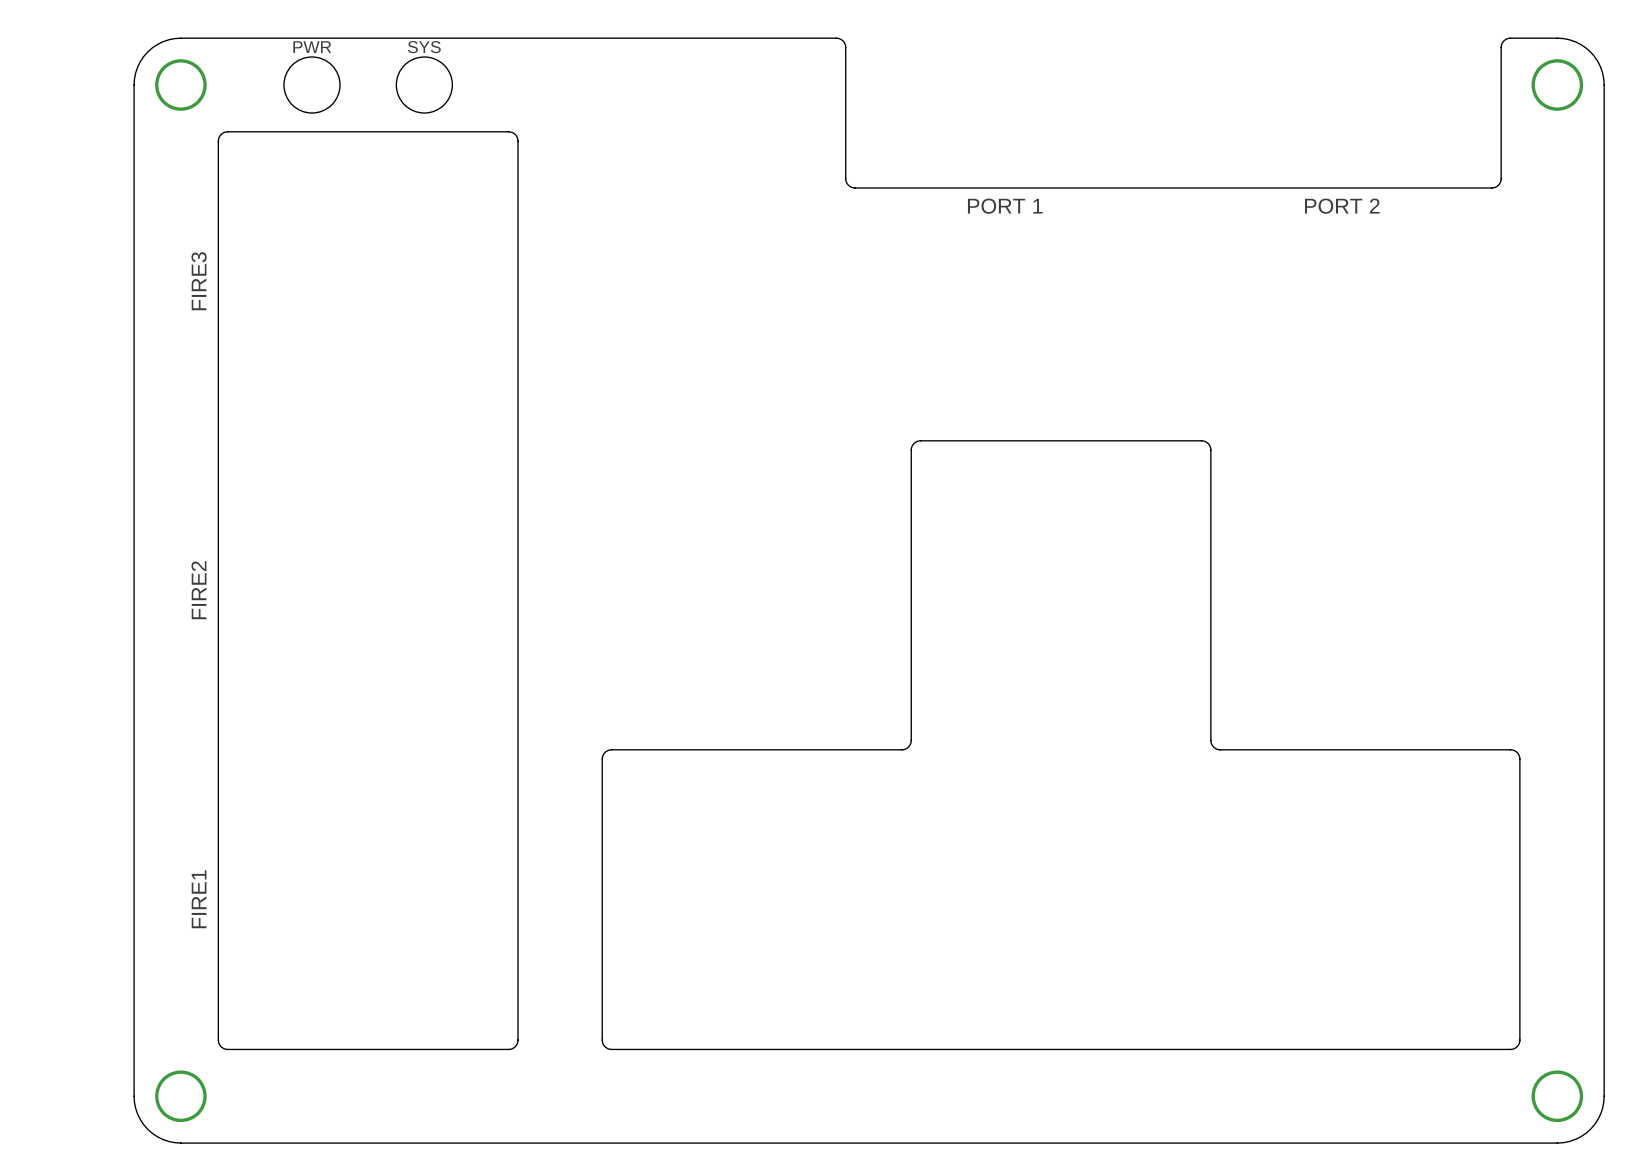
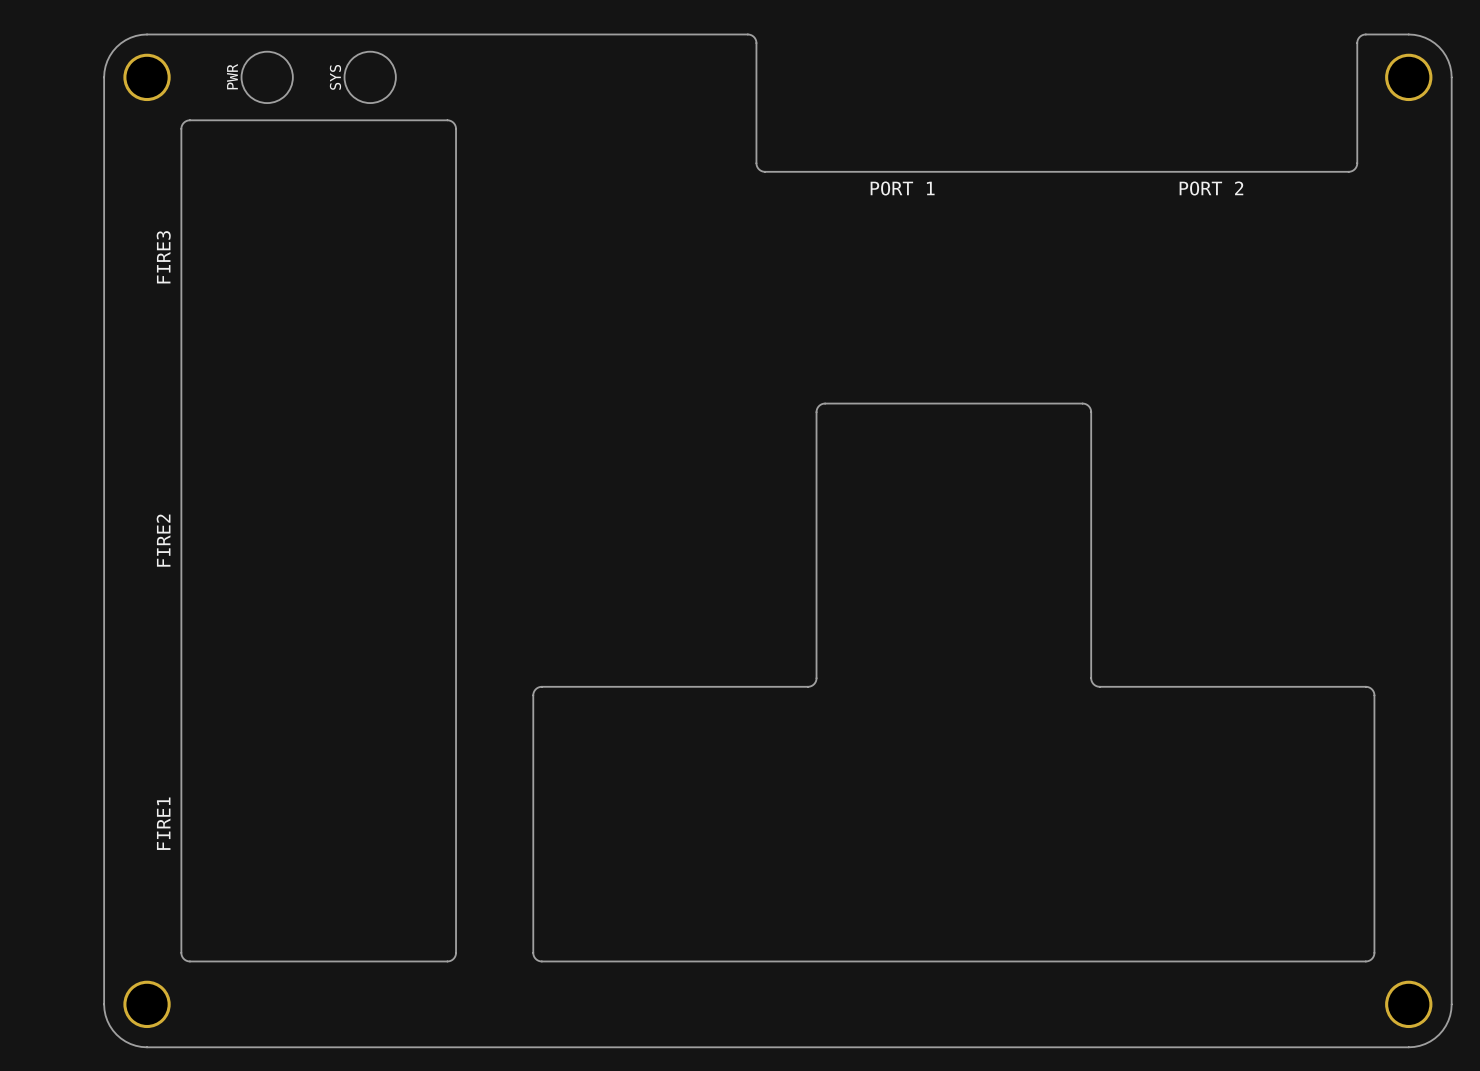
text rotation: 0° (312, 47) -> 90° counterclockwise (232, 76)
text position: PWR (312, 47) -> PWR (232, 76)
text rotation: 0° (424, 47) -> 90° counterclockwise (335, 77)
text position: SYS (424, 47) -> SYS (335, 77)

